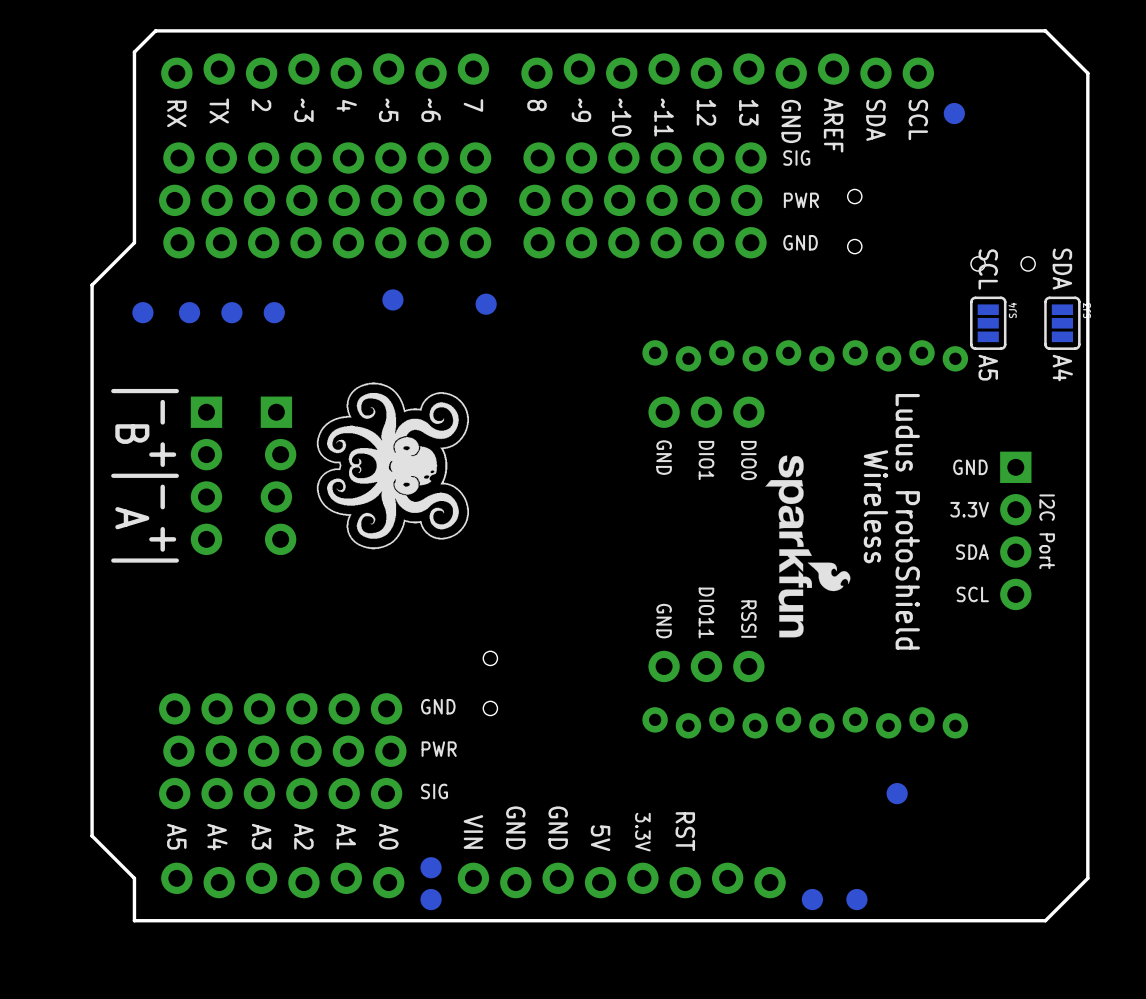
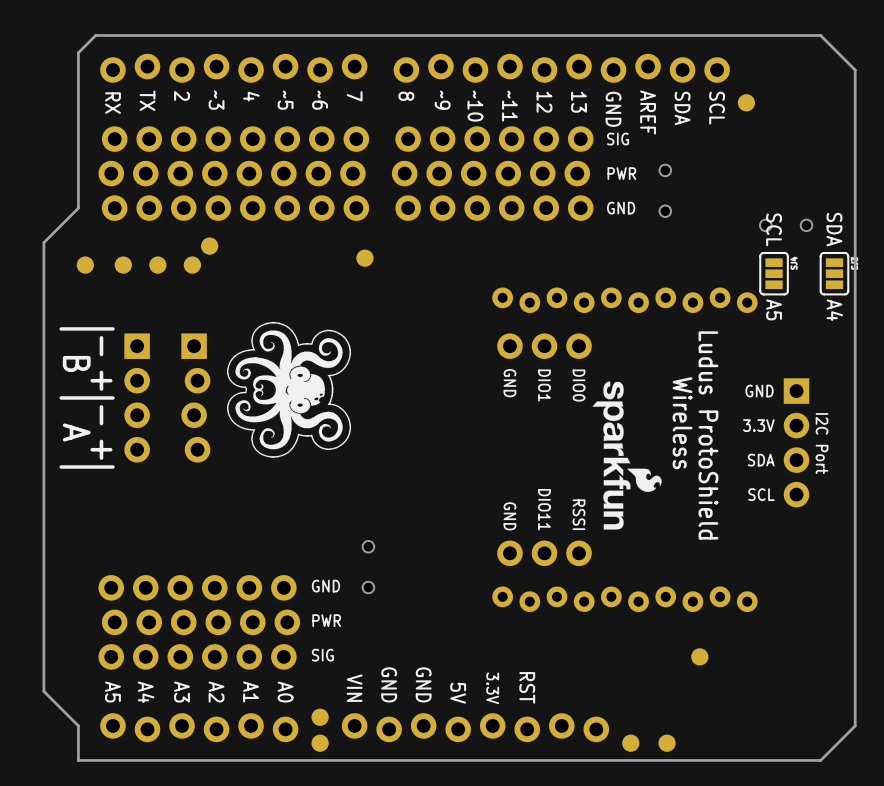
part position: (392, 299) -> (209, 246)

